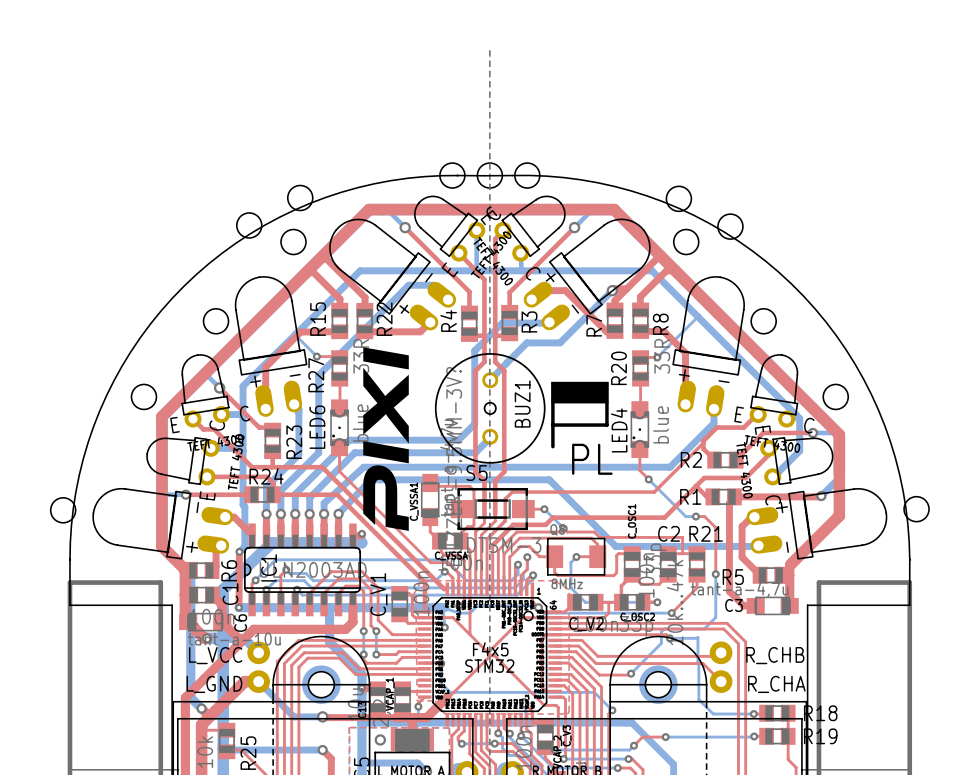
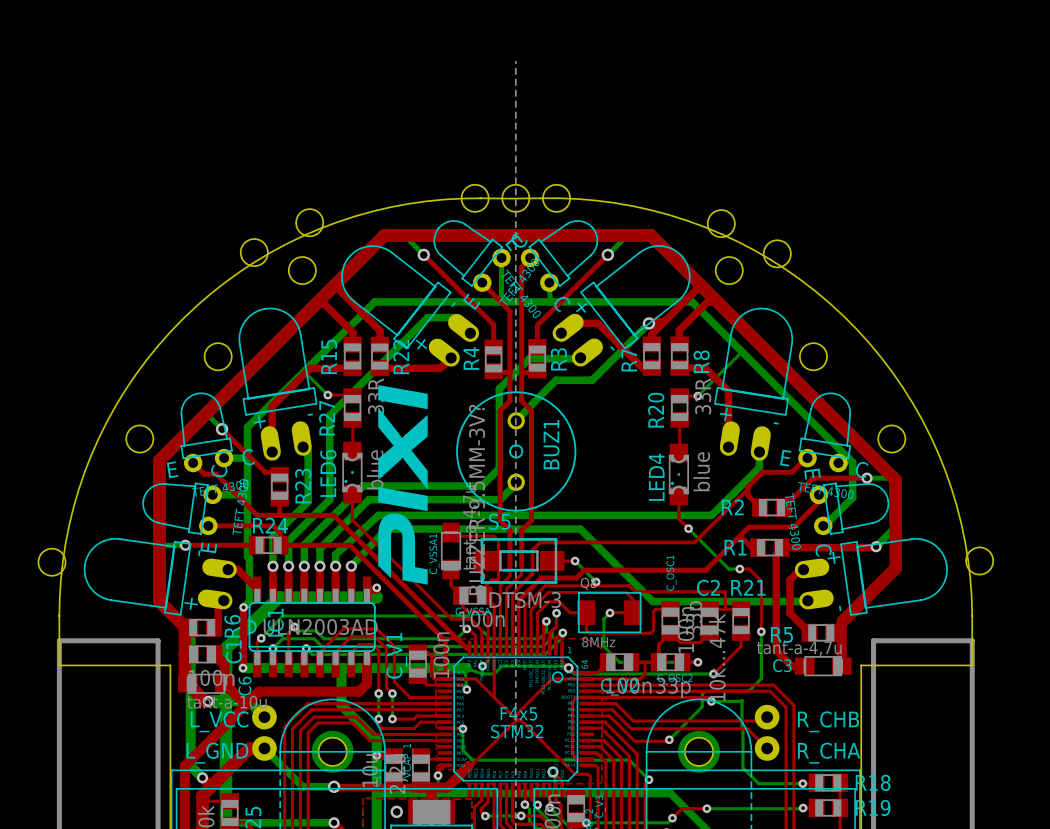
drawing: [551, 381, 609, 404] -> none
line: (552, 403) (552, 446) -> none
line: (606, 403) (606, 425) (552, 425) -> none
text: PL (592, 459) -> none

